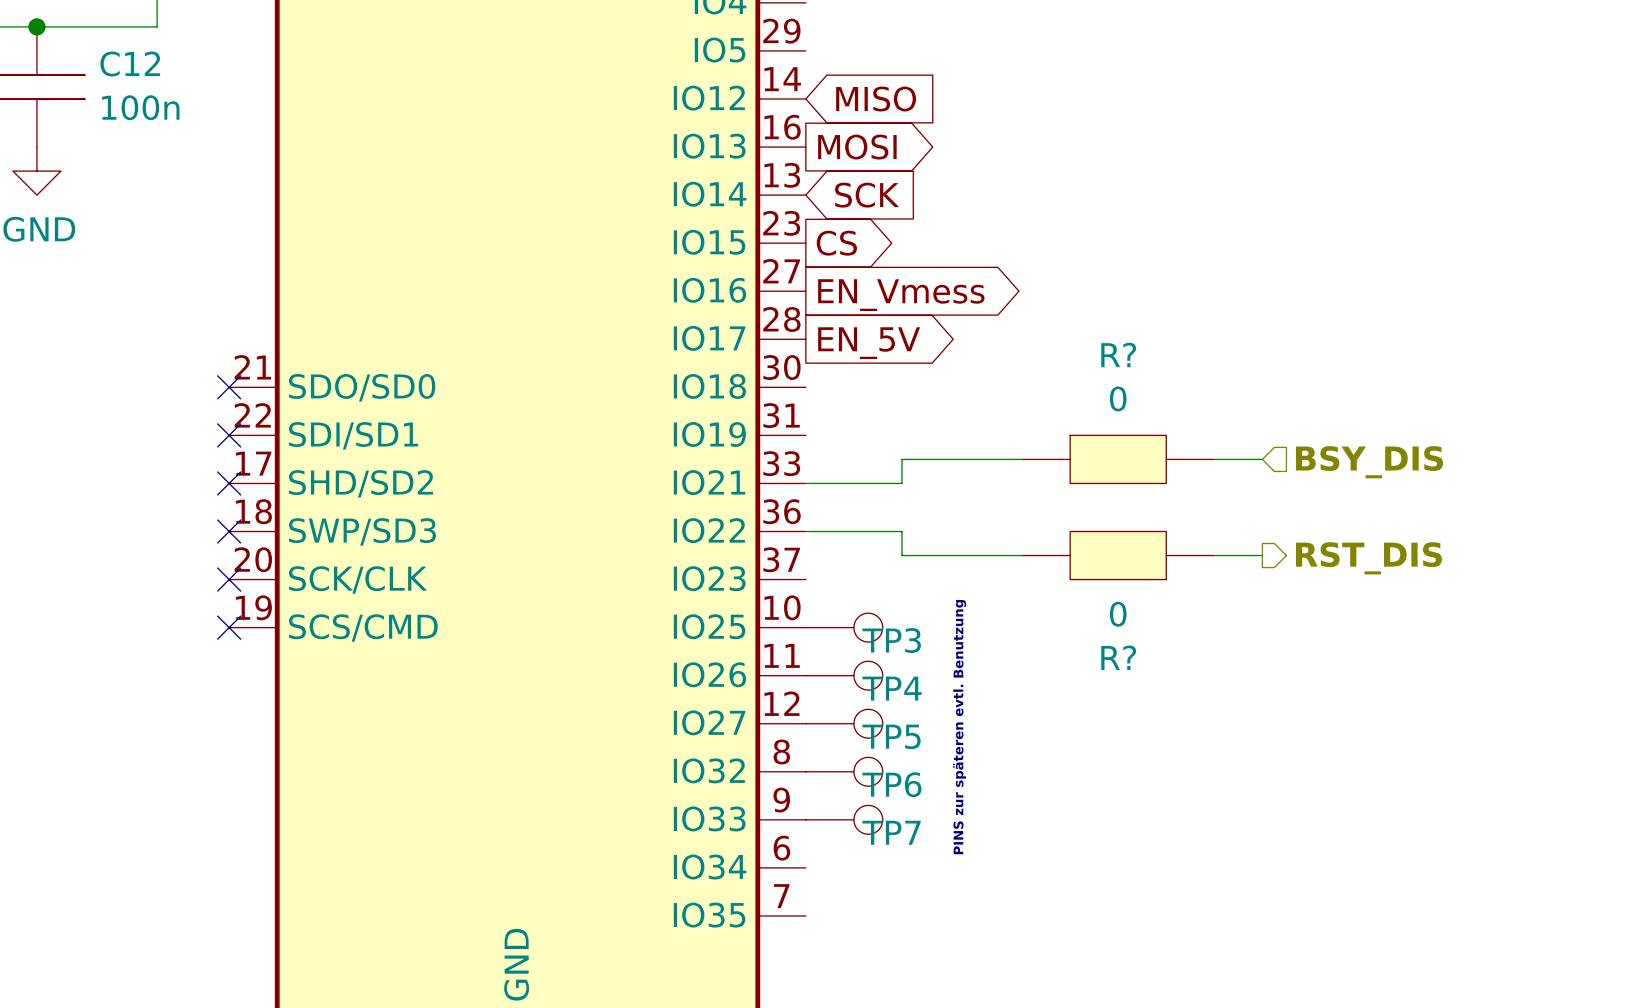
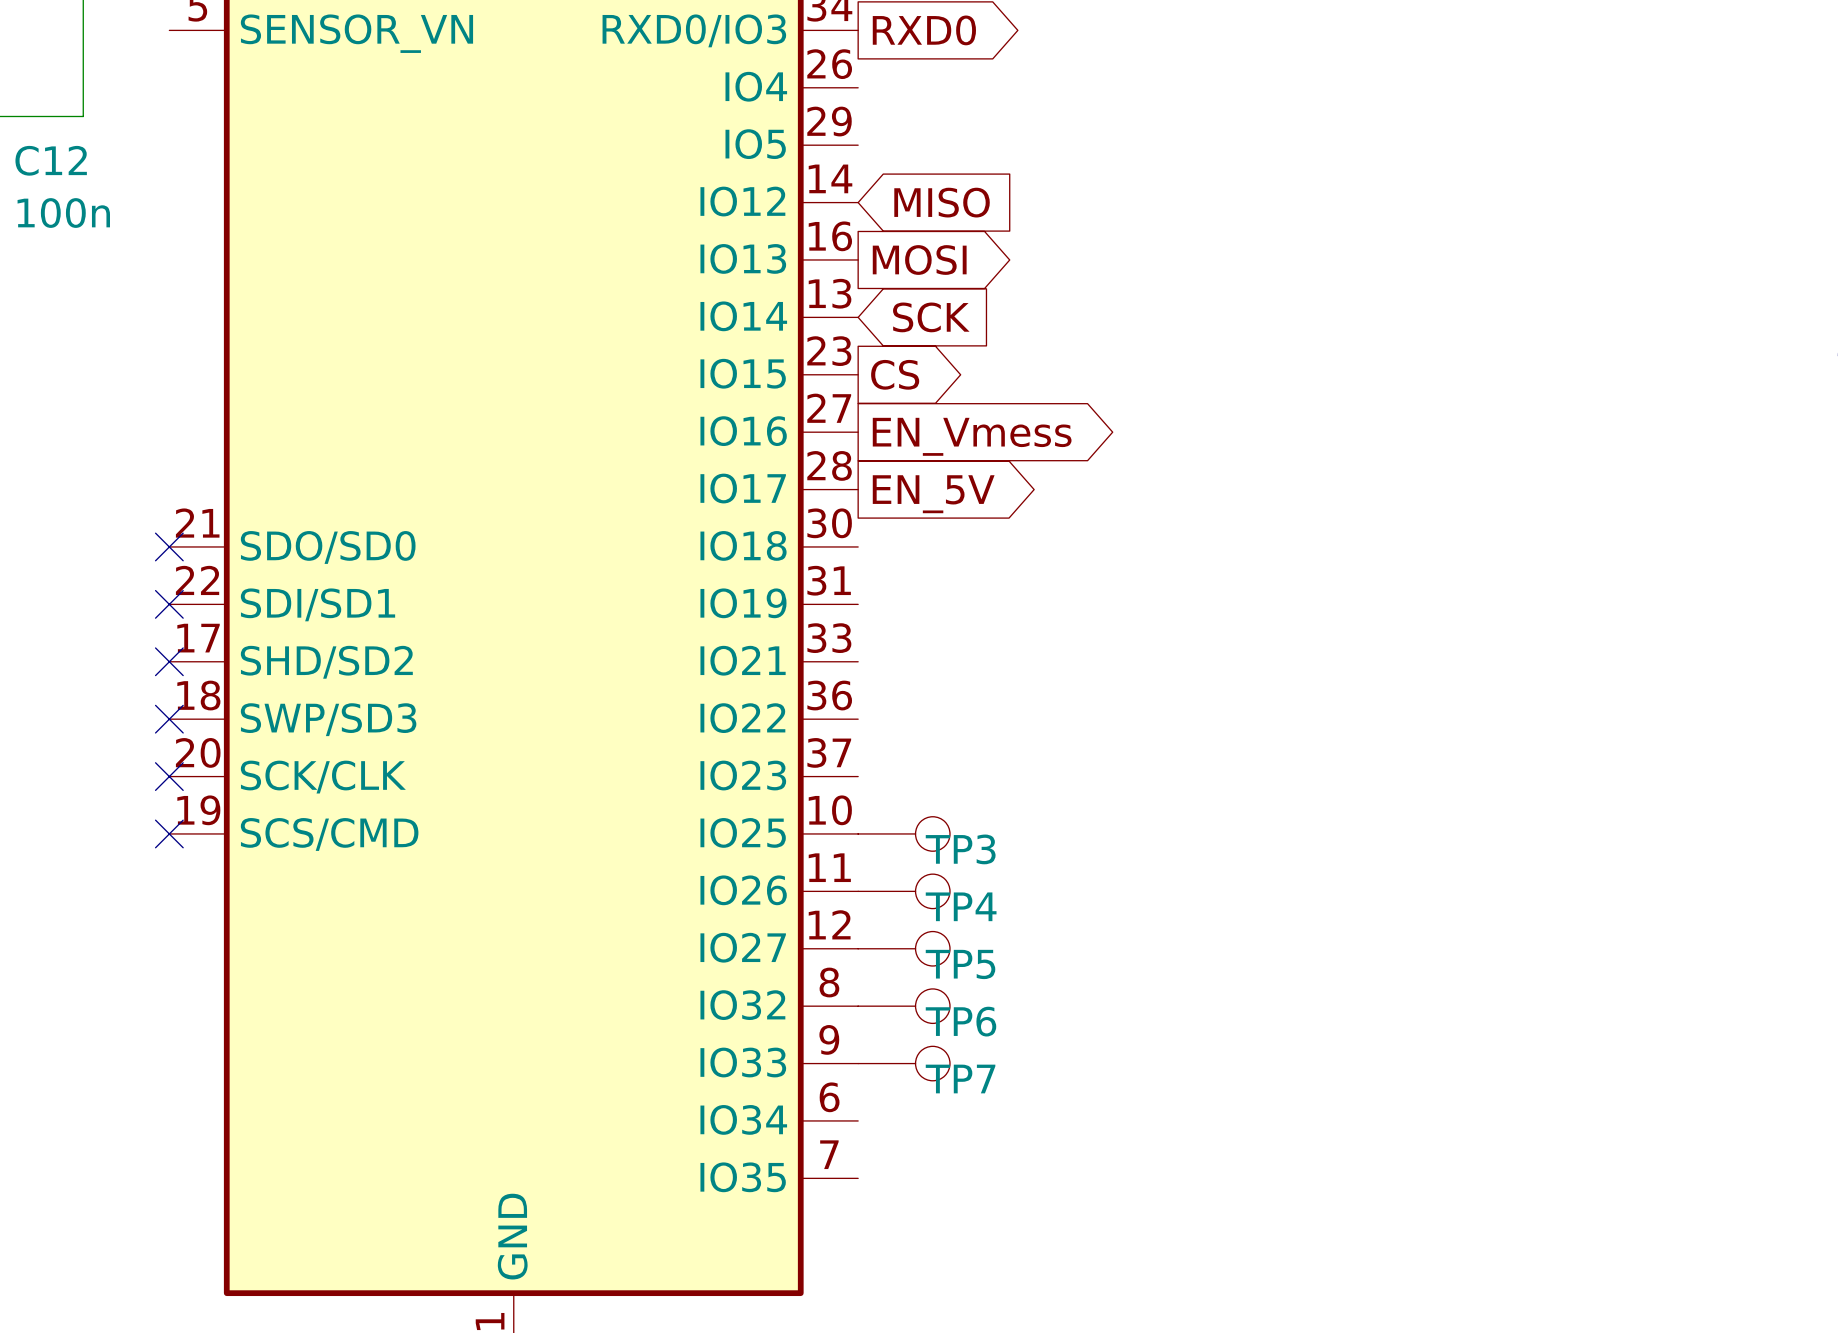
wire: (1022, 459) (901, 459) (901, 483) (805, 483) -> none
R?: 0 (1118, 459) -> none
wire: (1214, 459) (1262, 459) -> none
hierarchical label: BSY_DIS (1369, 462) -> none
wire: (805, 531) (901, 531) (901, 555) (1022, 555) -> none
R?: 0 (1118, 555) -> none
wire: (1214, 555) (1262, 555) -> none
hierarchical label: RST_DIS (1368, 558) -> none
text: PINS zur späteren evtl. Benutzung (959, 727) -> none

